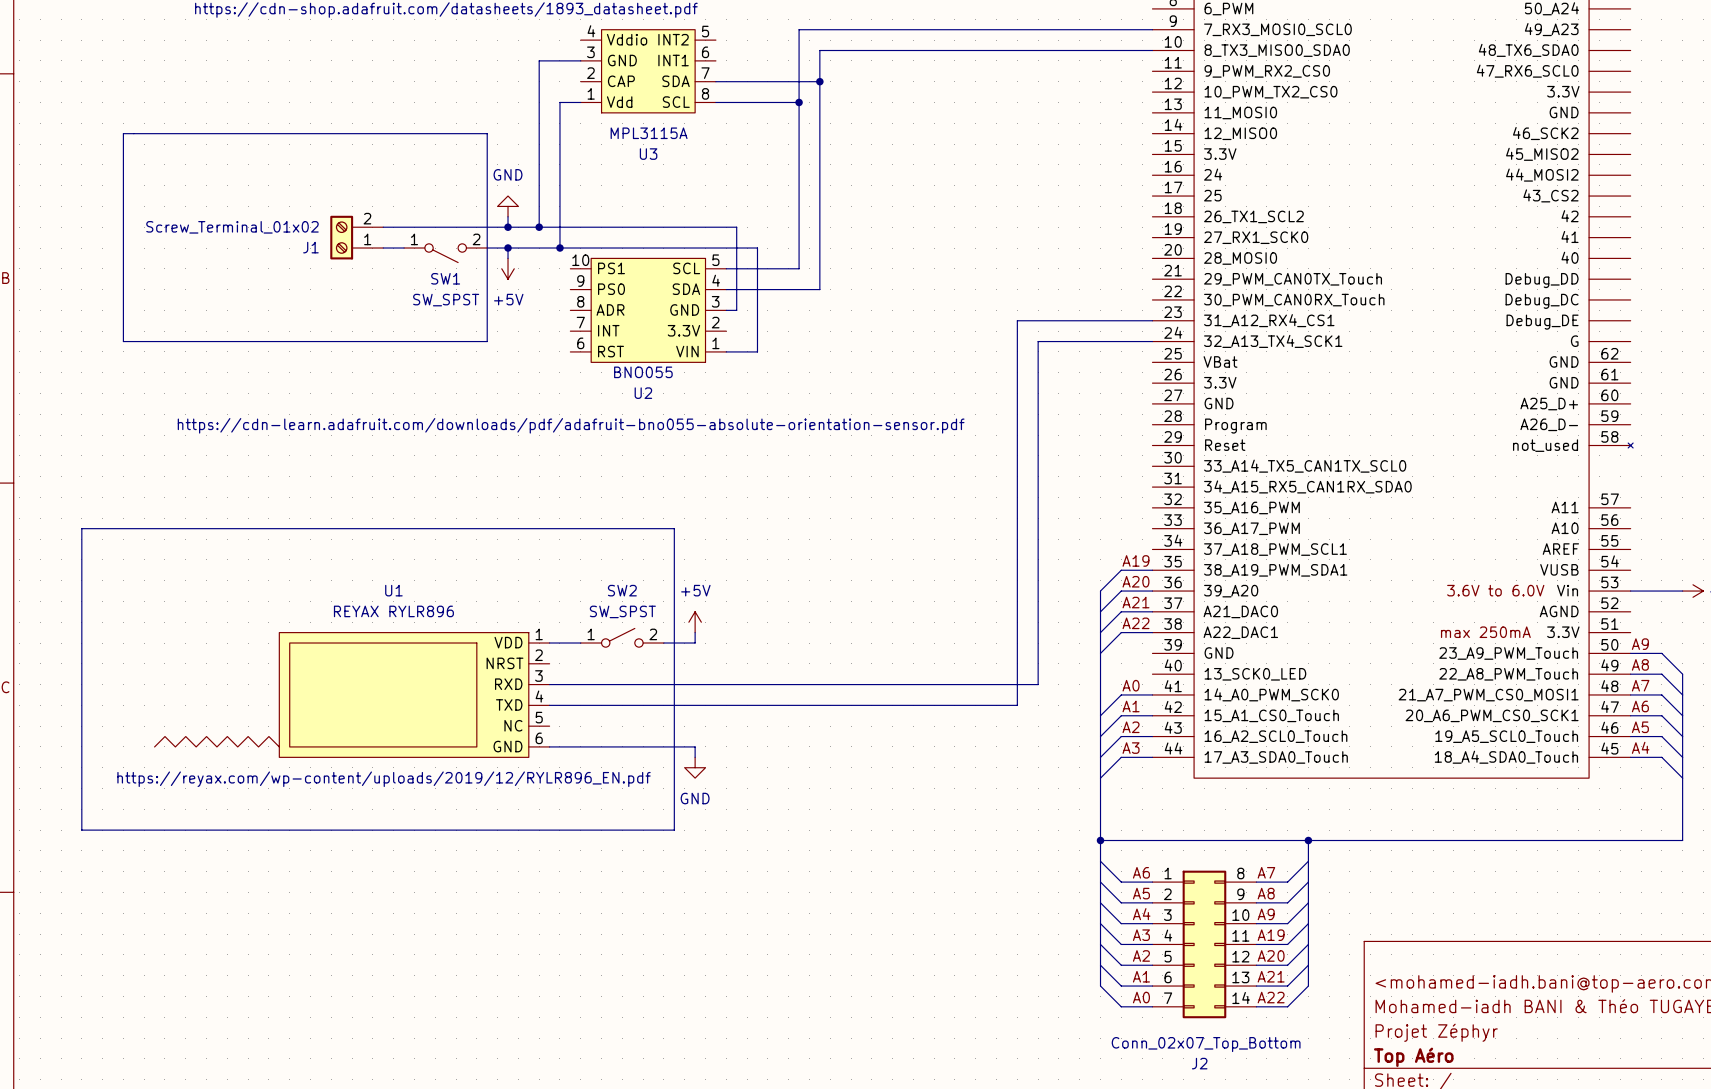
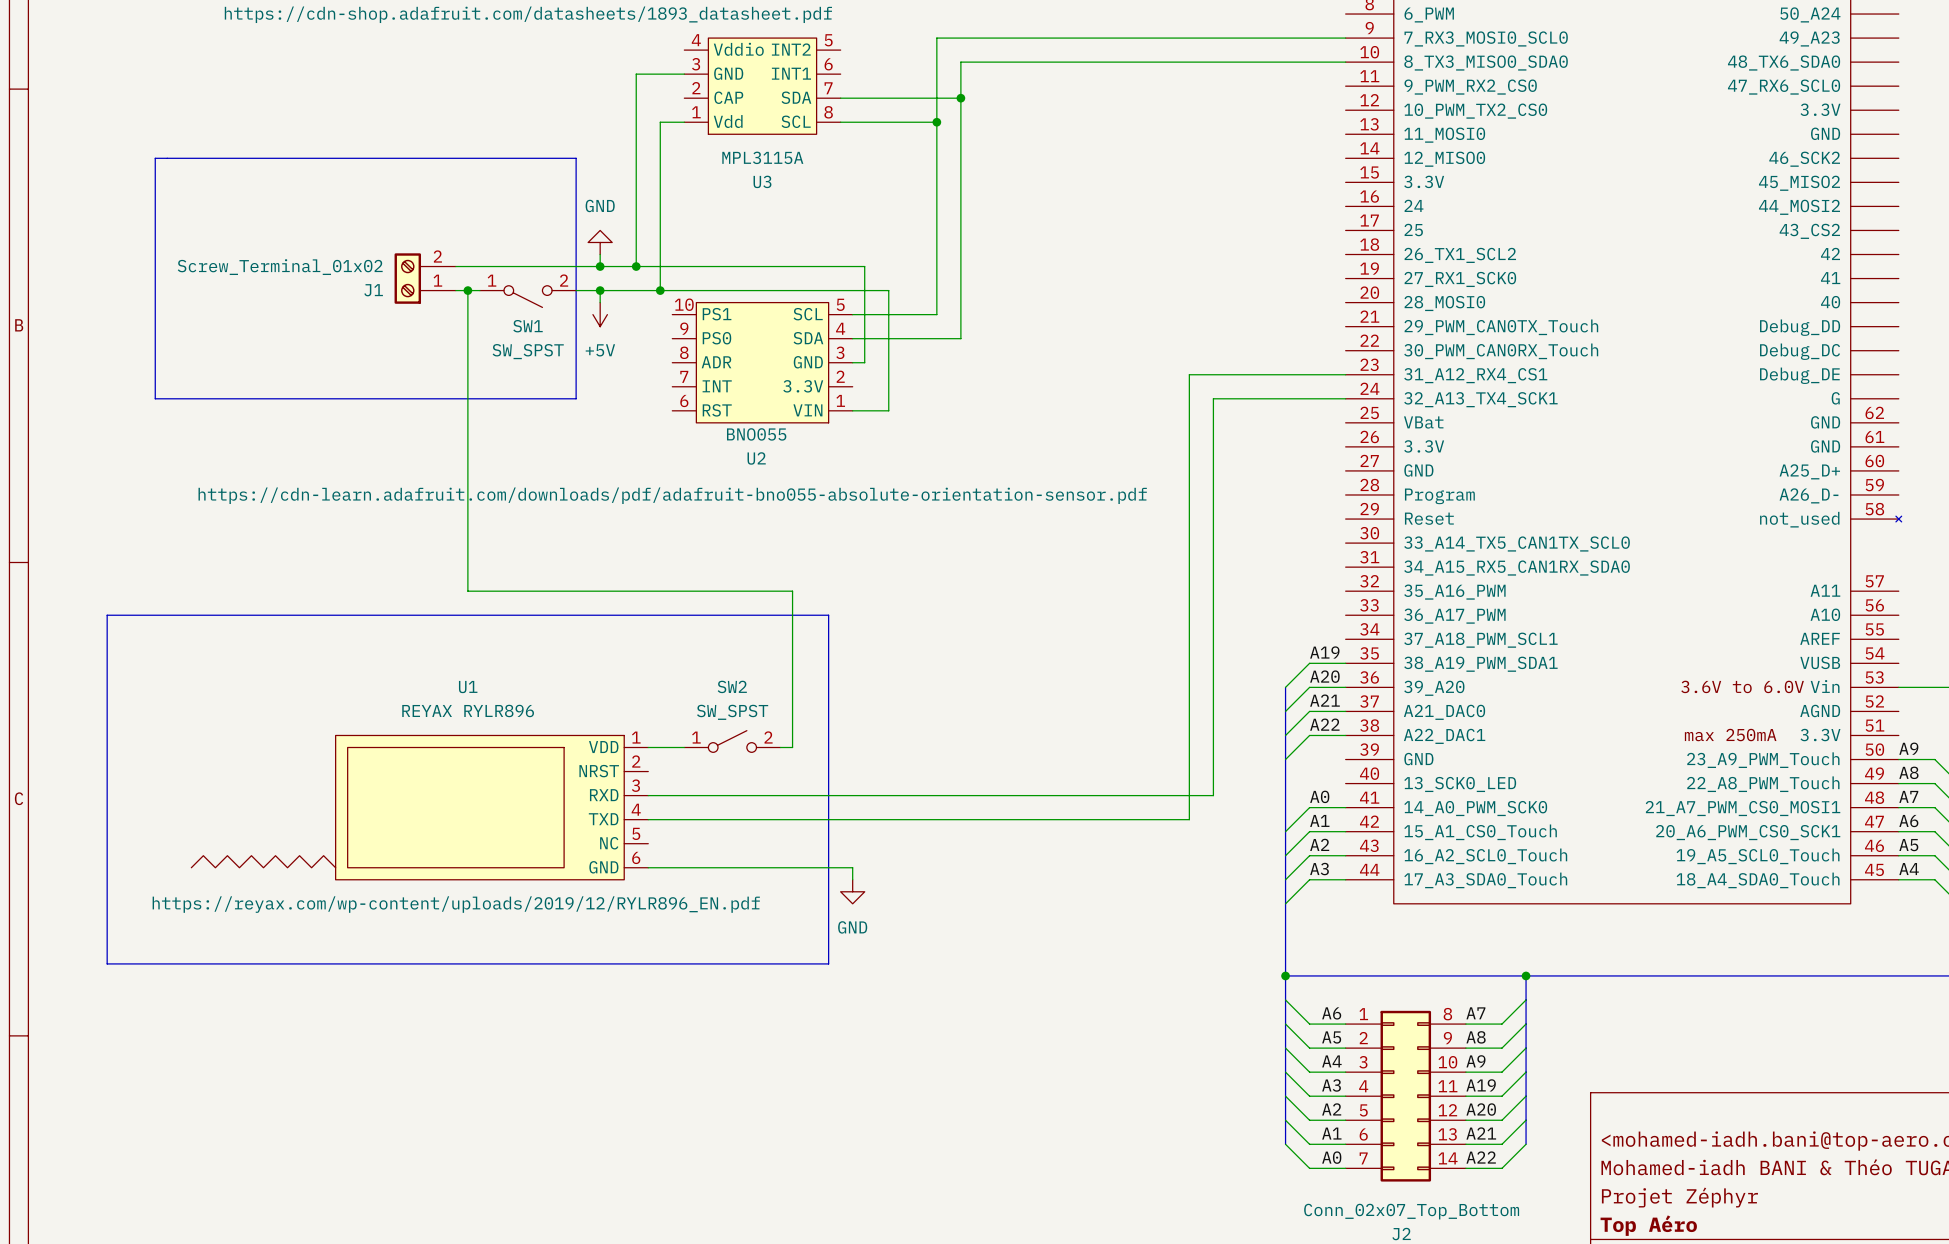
junction: none -> (467, 290)
line: (674, 528) (674, 830) -> (792, 615) (828, 615) (828, 963) (792, 963)
power symbol: +5V (695, 622) -> none
wire: (695, 632) (695, 643) (674, 643) -> (467, 290) (467, 591) (792, 591) (792, 747)
wire: (695, 746) (695, 757) -> (816, 867) (852, 867) (852, 879)
power symbol position: GND (695, 767) -> GND (852, 891)

